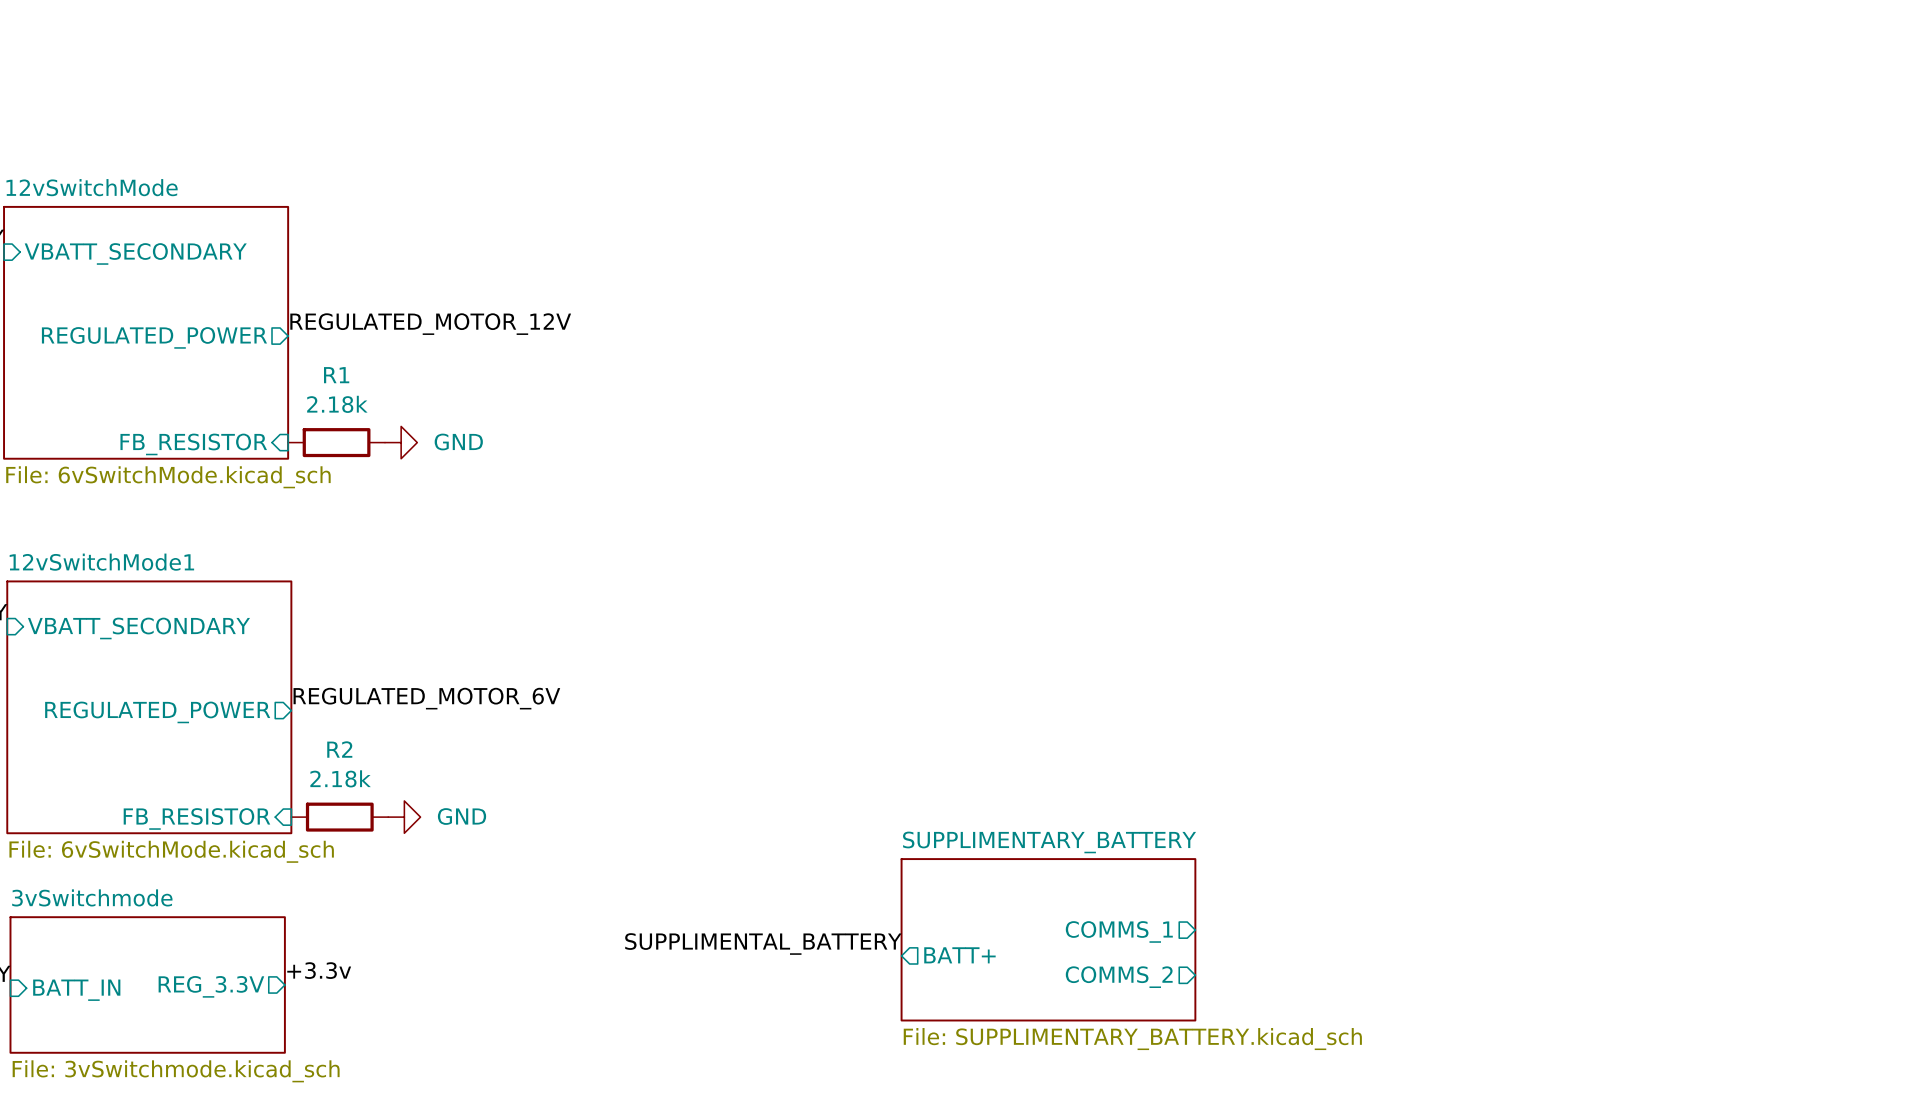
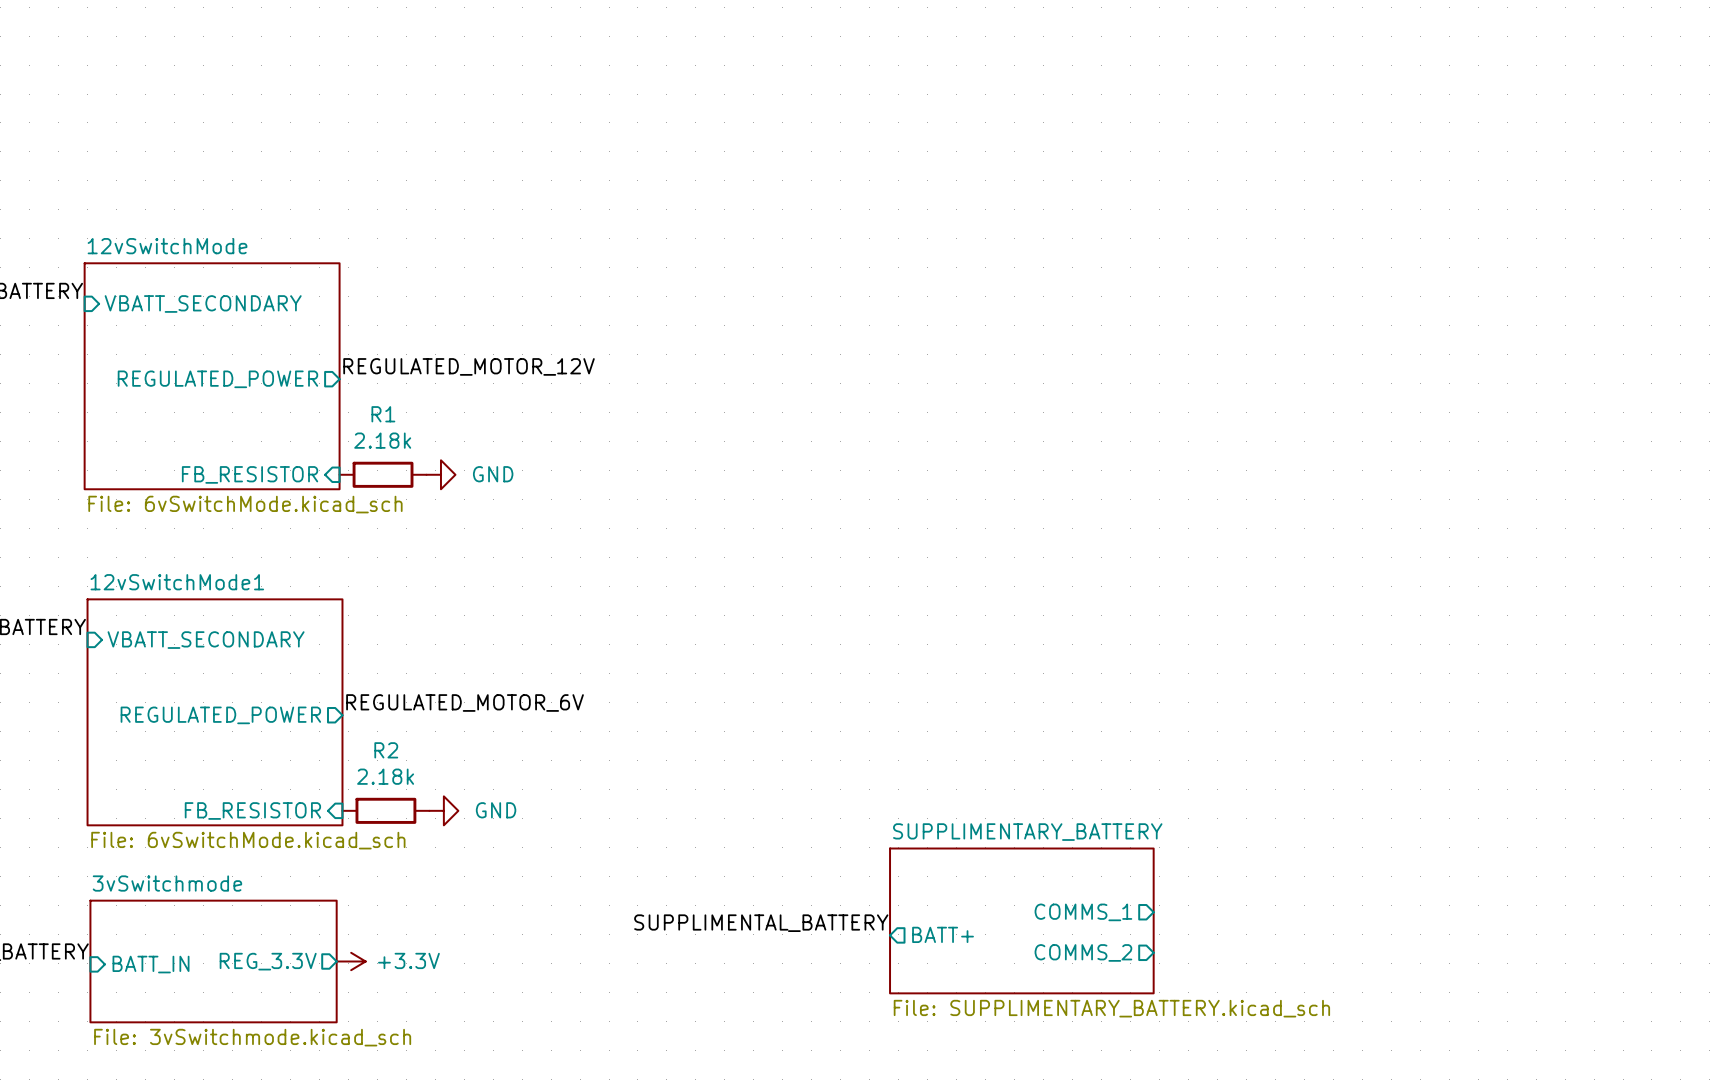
label: +3.3v (319, 970) -> none
power symbol: none -> +3.3V (351, 961)

